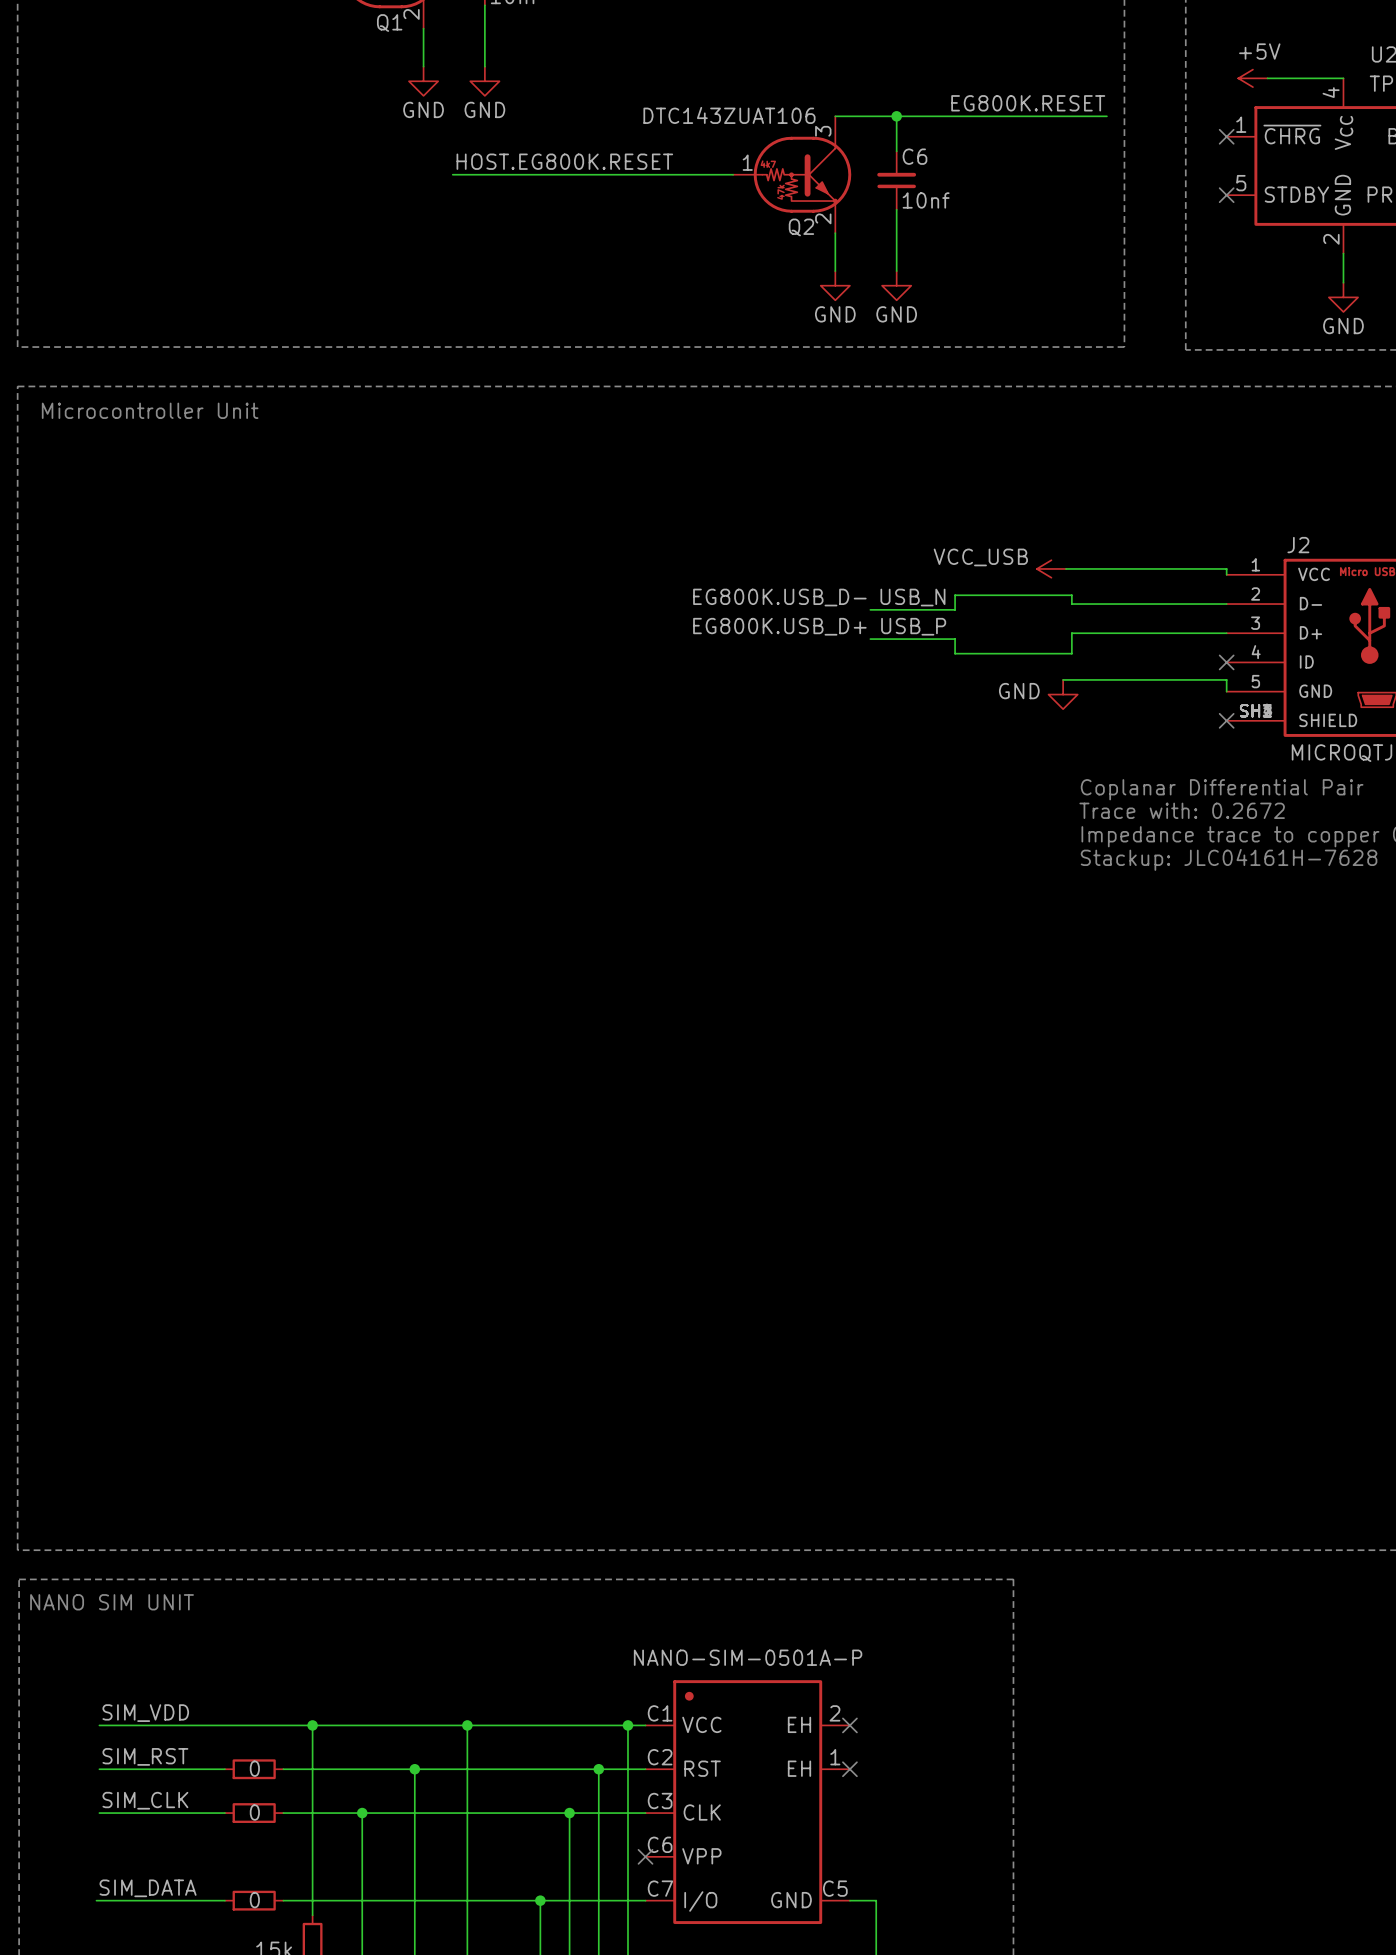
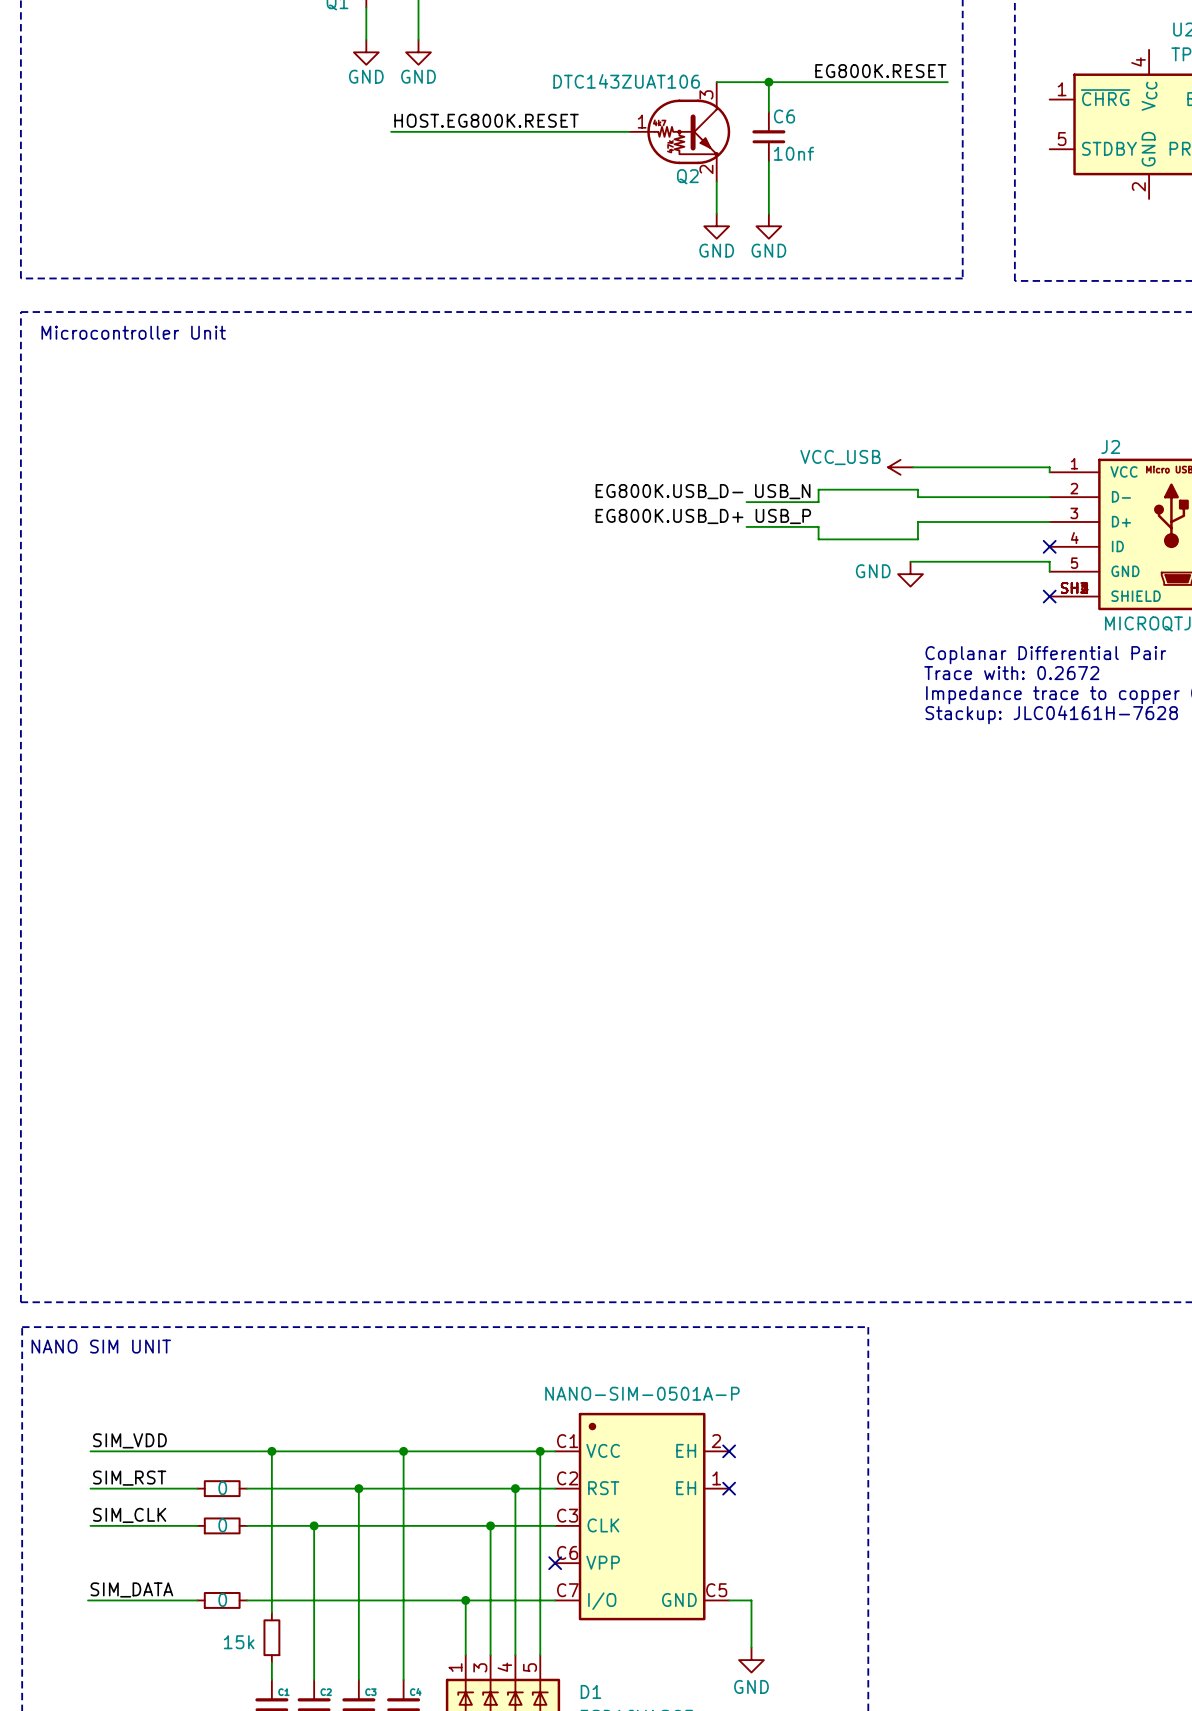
power symbol: +5V (1252, 78) -> none
wire: (1267, 78) (1343, 78) -> none
no-connect mark: (1226, 136) -> none
no-connect mark: (1226, 195) -> none
wire: (1343, 253) (1343, 282) -> none
power symbol: GND (1343, 297) -> none

